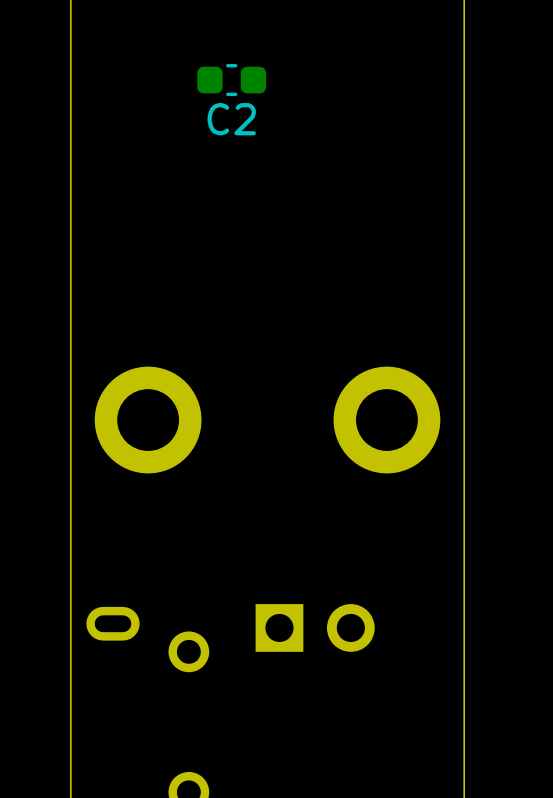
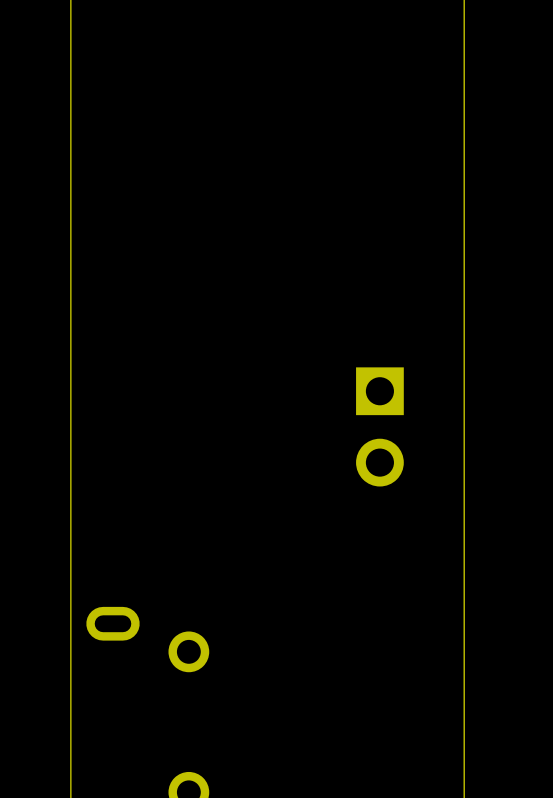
C2: (231, 80) -> none
part footprint: [333, 366, 441, 474] -> [356, 367, 404, 487]
part: (148, 420) -> none
part: (315, 627) -> none

